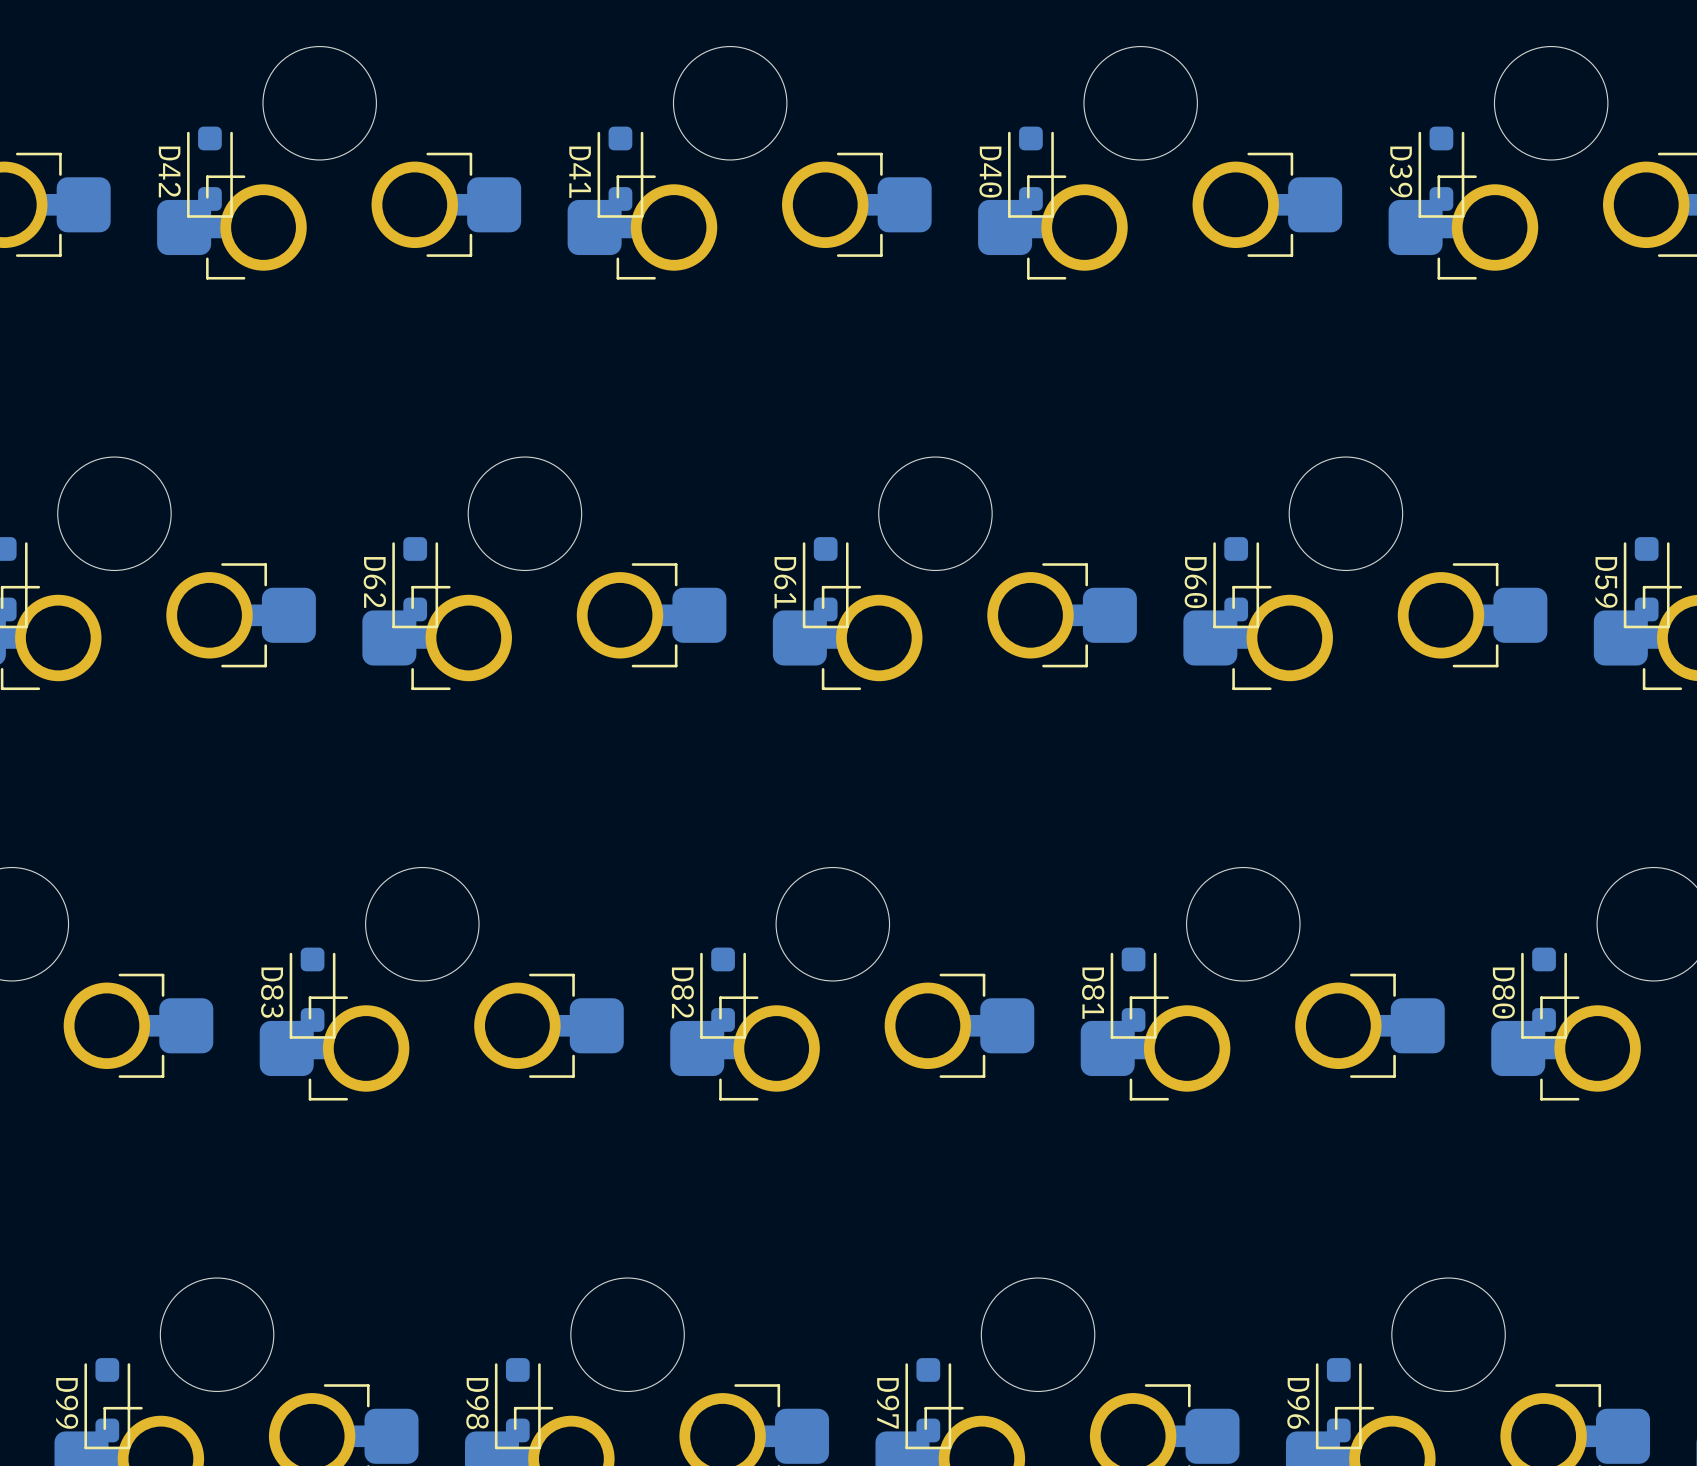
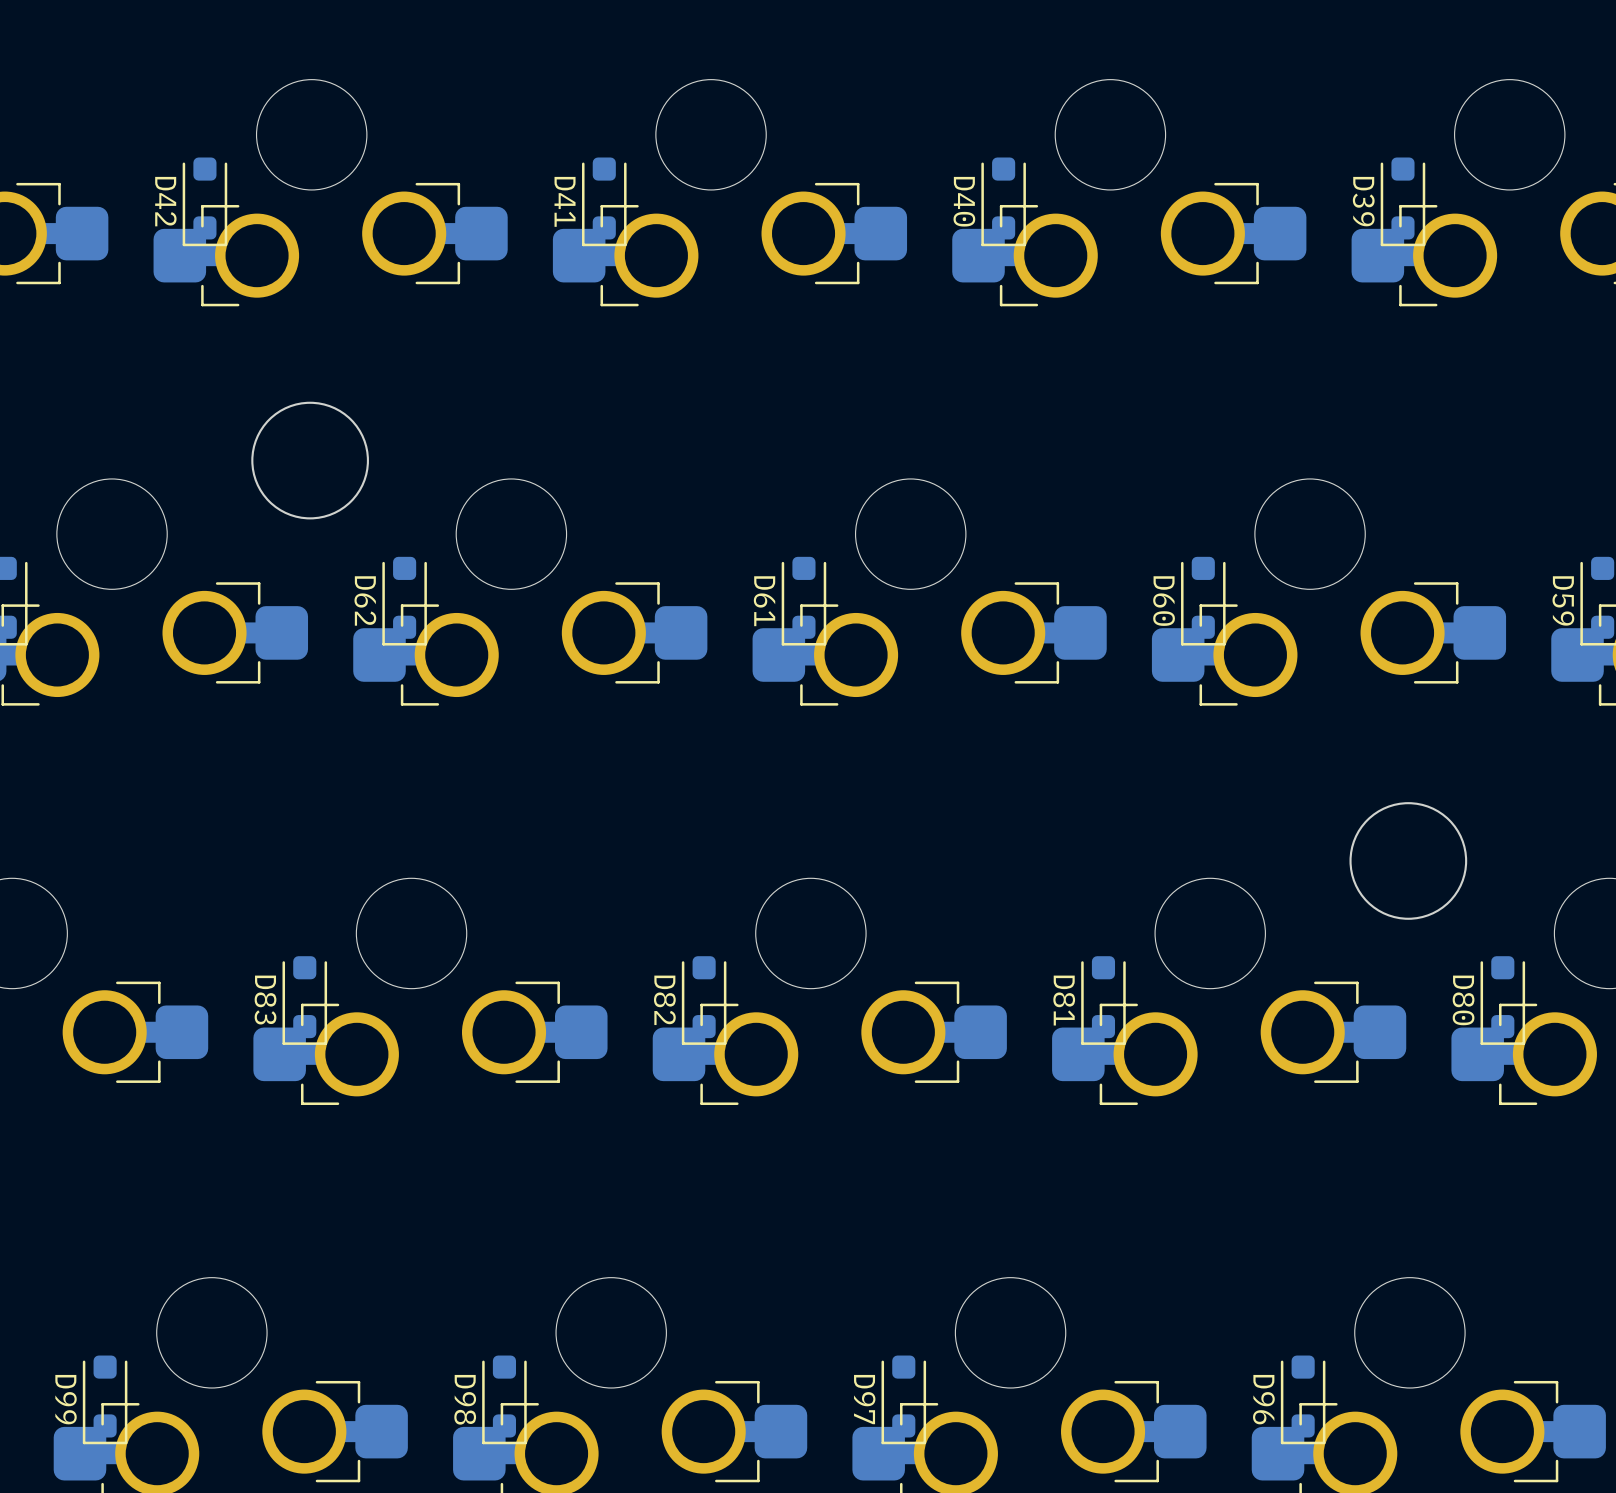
round board edge: none -> [251, 401, 369, 520]
round board edge: none -> [1349, 802, 1468, 920]

